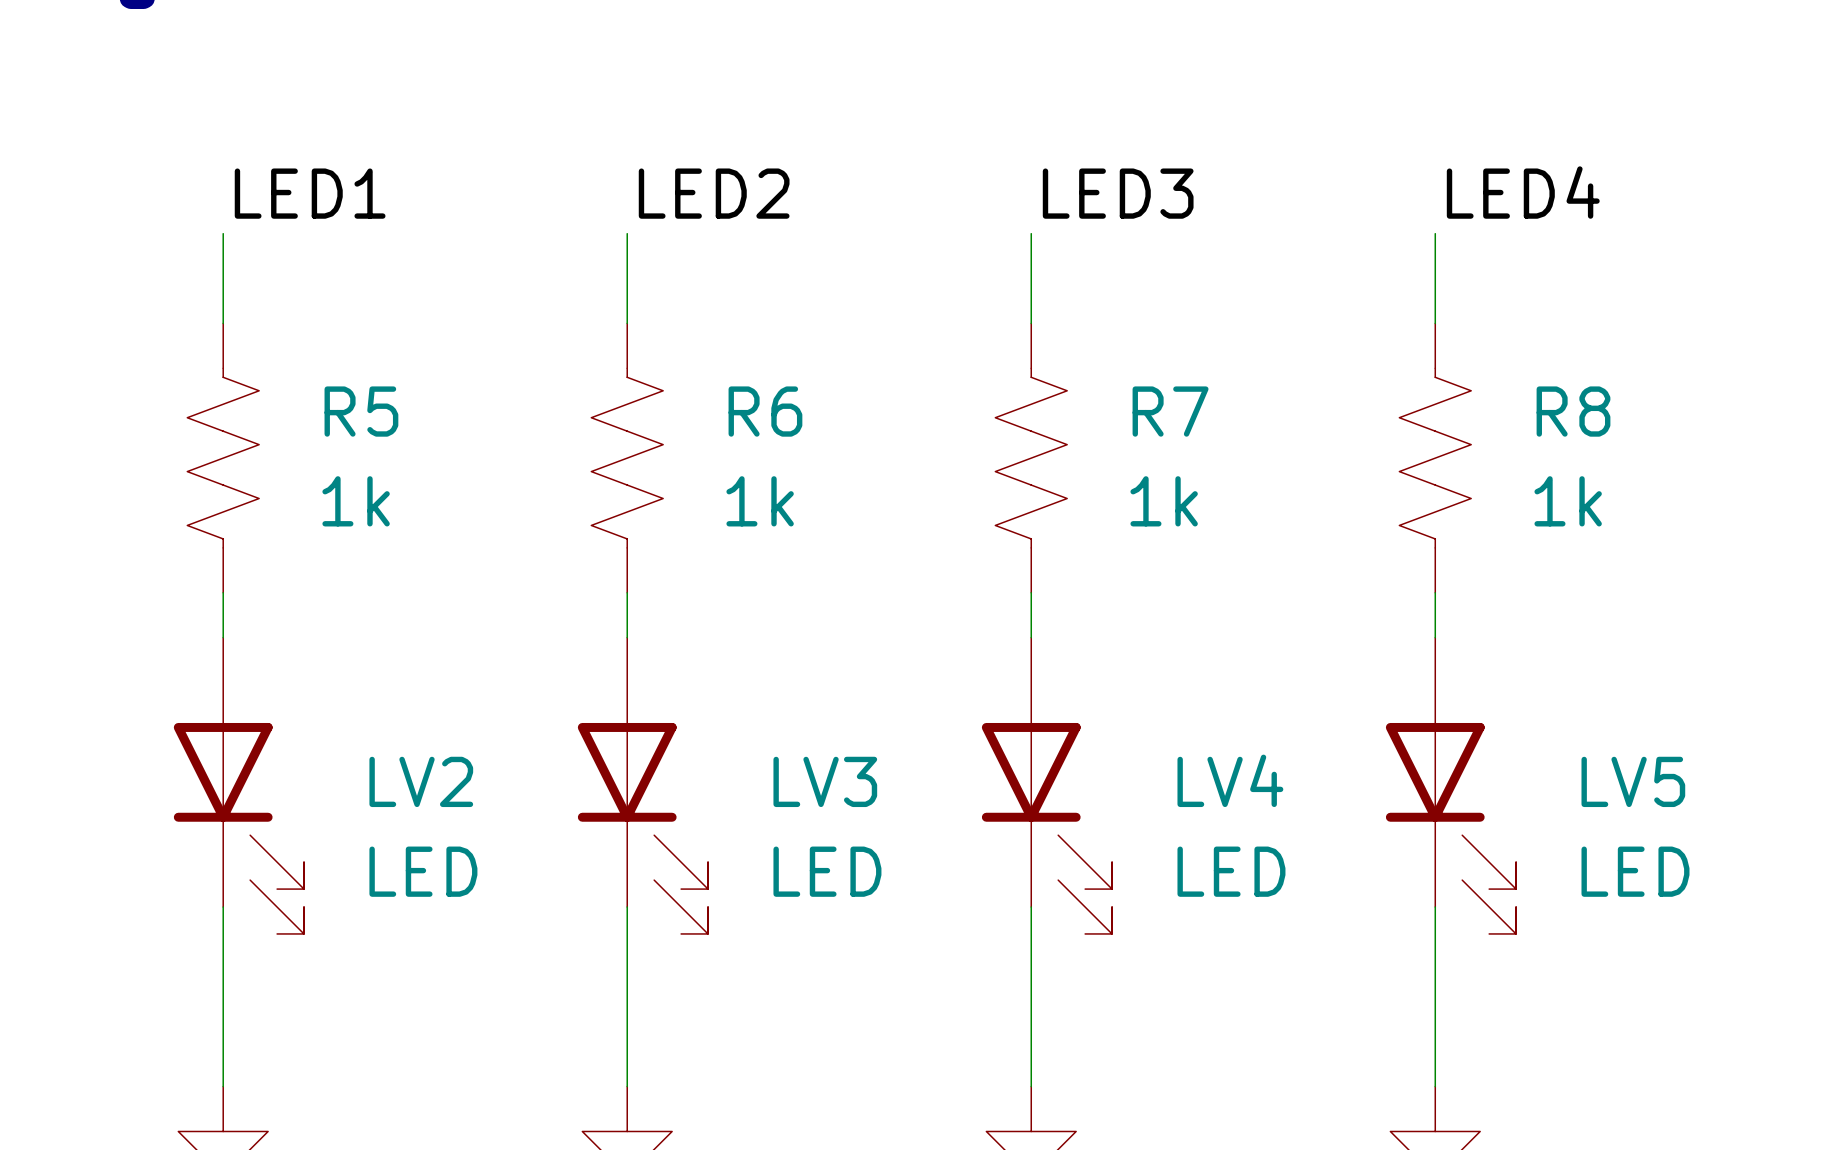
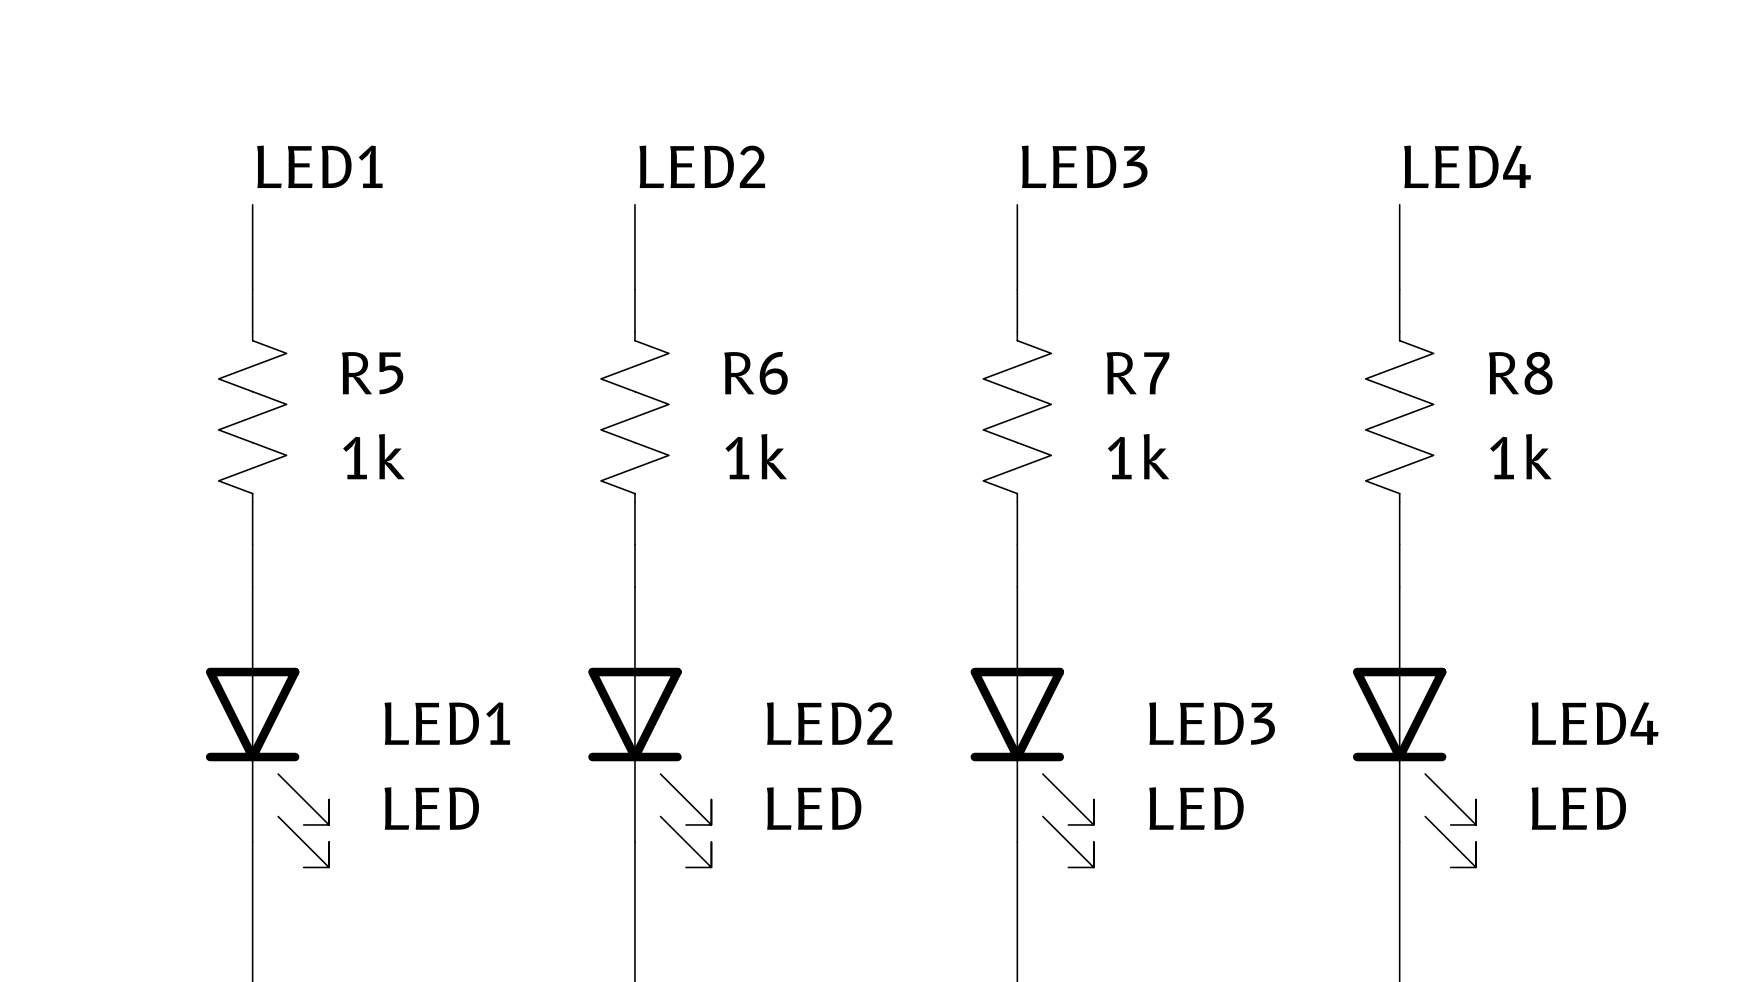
LV4 name: LV4 (1230, 780) -> LED3 (1212, 723)
LV2 name: LV2 (421, 781) -> LED1 (447, 723)
LV3 name: LV3 (825, 781) -> LED2 (829, 723)
LV5 name: LV5 (1633, 781) -> LED4 (1595, 723)

